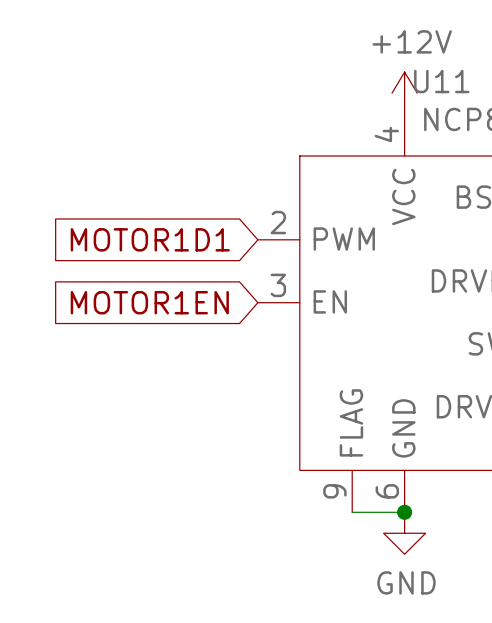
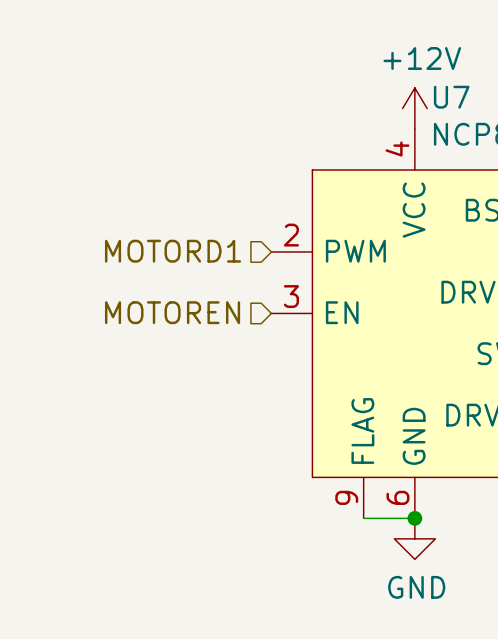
U11 name: U11 (441, 81) -> U7 (451, 97)
global label: MOTOR1D1 (150, 239) -> none
hierarchical label: none -> MOTORD1 (173, 251)
hierarchical label: none -> MOTOREN (172, 312)
global label: MOTOR1EN (149, 302) -> none

